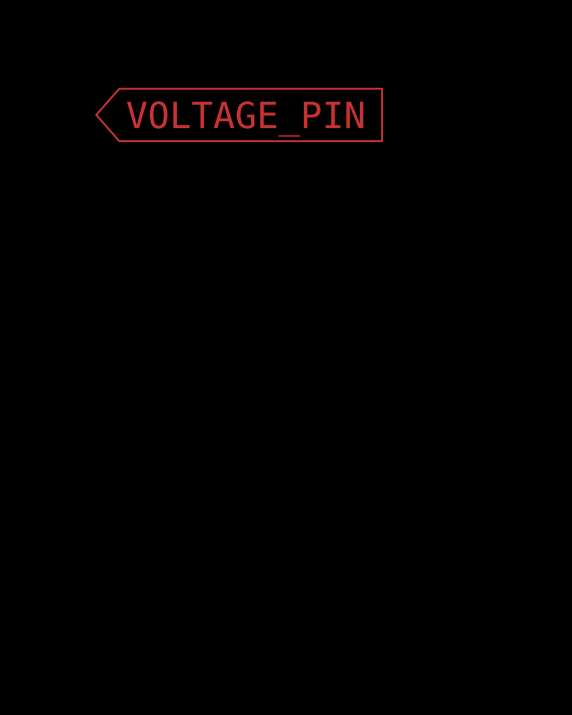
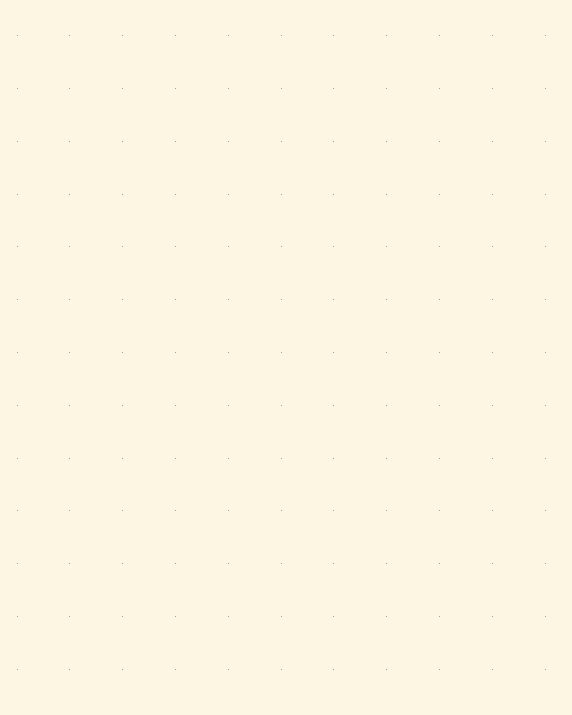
global label: VOLTAGE_PIN (245, 118) -> none

